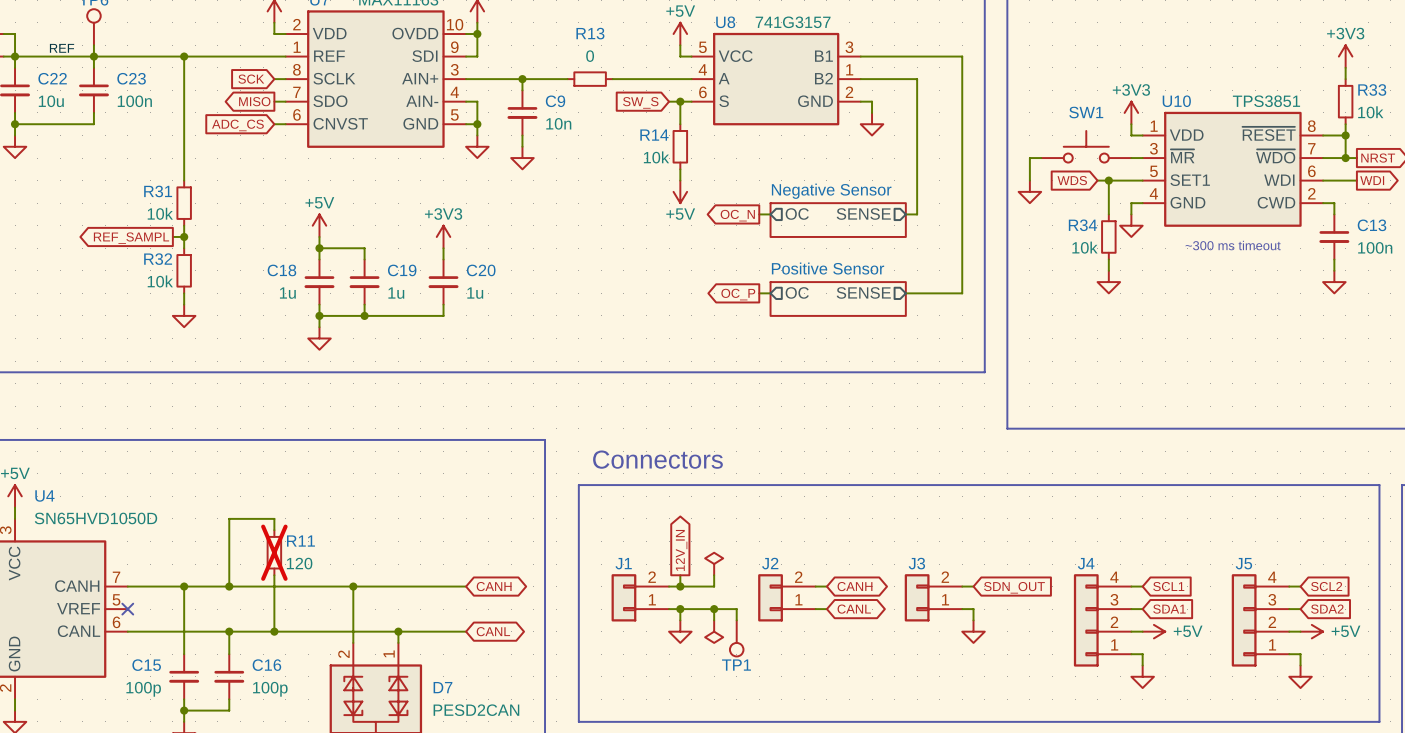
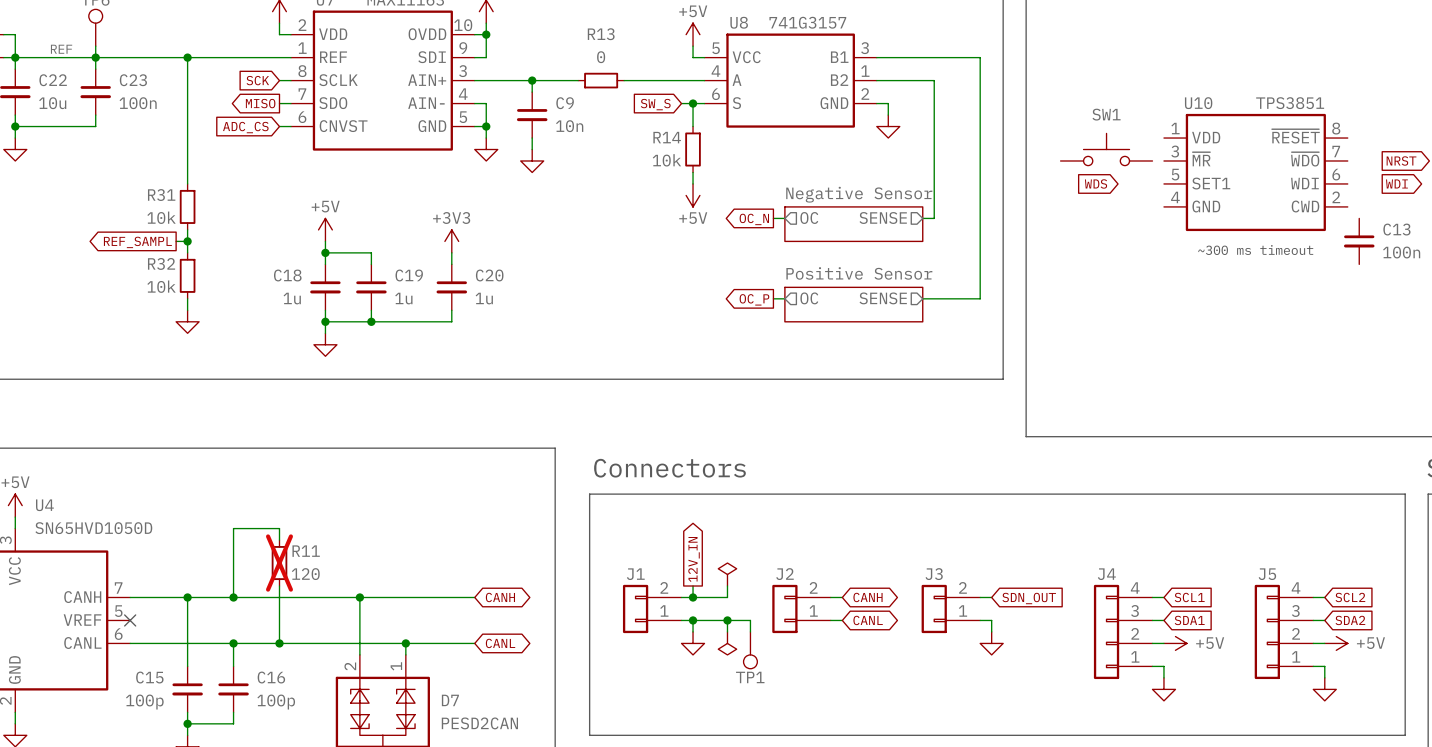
power symbol: +3V3 (1345, 56) -> none
wire: (1345, 67) (1345, 79) -> none
R33: 10k (1345, 101) -> none
power symbol: +3V3 (1131, 112) -> none
wire: (1131, 124) (1131, 135) (1142, 135) -> none
wire: (1345, 124) (1345, 158) -> none
wire: (1323, 135) (1345, 135) -> none
junction: (1345, 135) -> none
wire: (1041, 158) (1029, 158) (1029, 180) -> none
wire: (1131, 158) (1142, 158) -> none
wire: (1323, 158) (1356, 158) -> none
junction: (1345, 158) -> none
wire: (1097, 180) (1142, 180) -> none
wire: (1108, 180) (1108, 214) -> none
junction: (1108, 180) -> none
wire: (1323, 180) (1356, 180) -> none
power symbol: (1029, 191) -> none
wire: (1142, 203) (1131, 203) (1131, 214) -> none
wire: (1323, 203) (1334, 203) (1334, 214) -> none
power symbol: (1131, 225) -> none
R34: 10k (1108, 236) -> none
wire: (1108, 259) (1108, 270) -> none
wire: (1334, 259) (1334, 270) -> none
power symbol: (1108, 282) -> none
power symbol: (1334, 282) -> none

